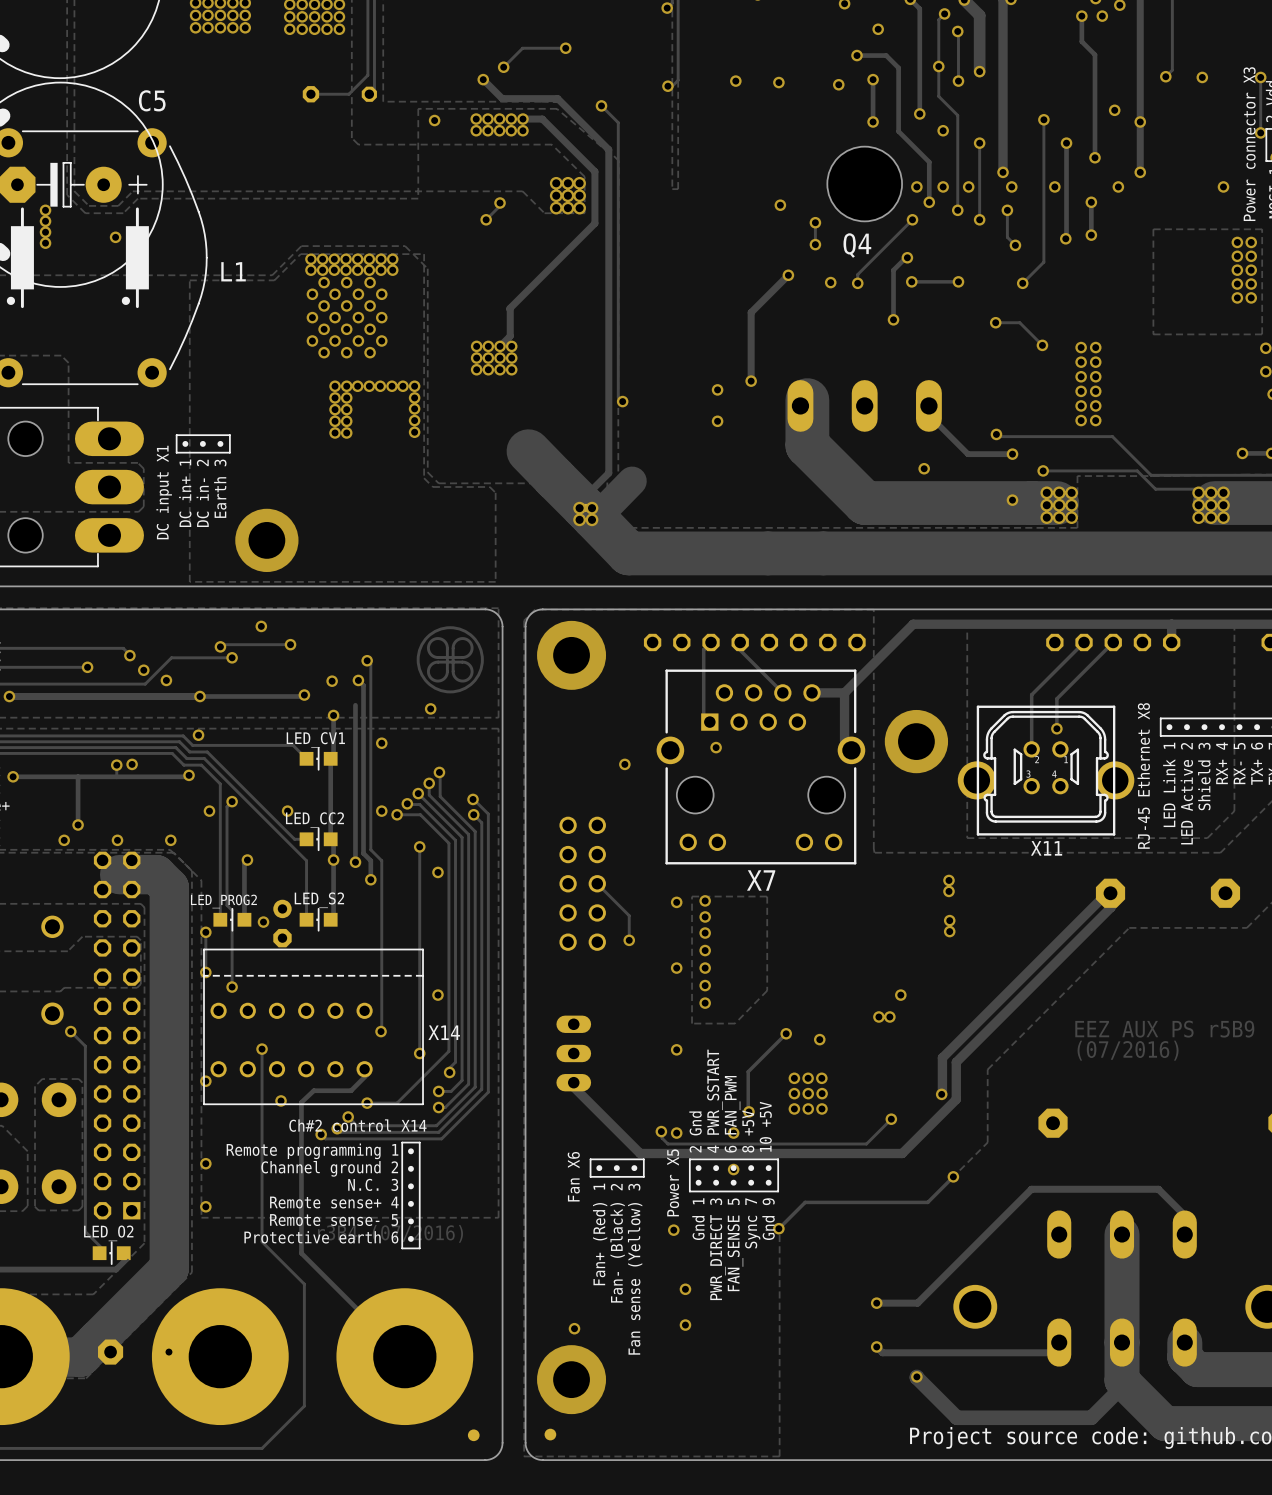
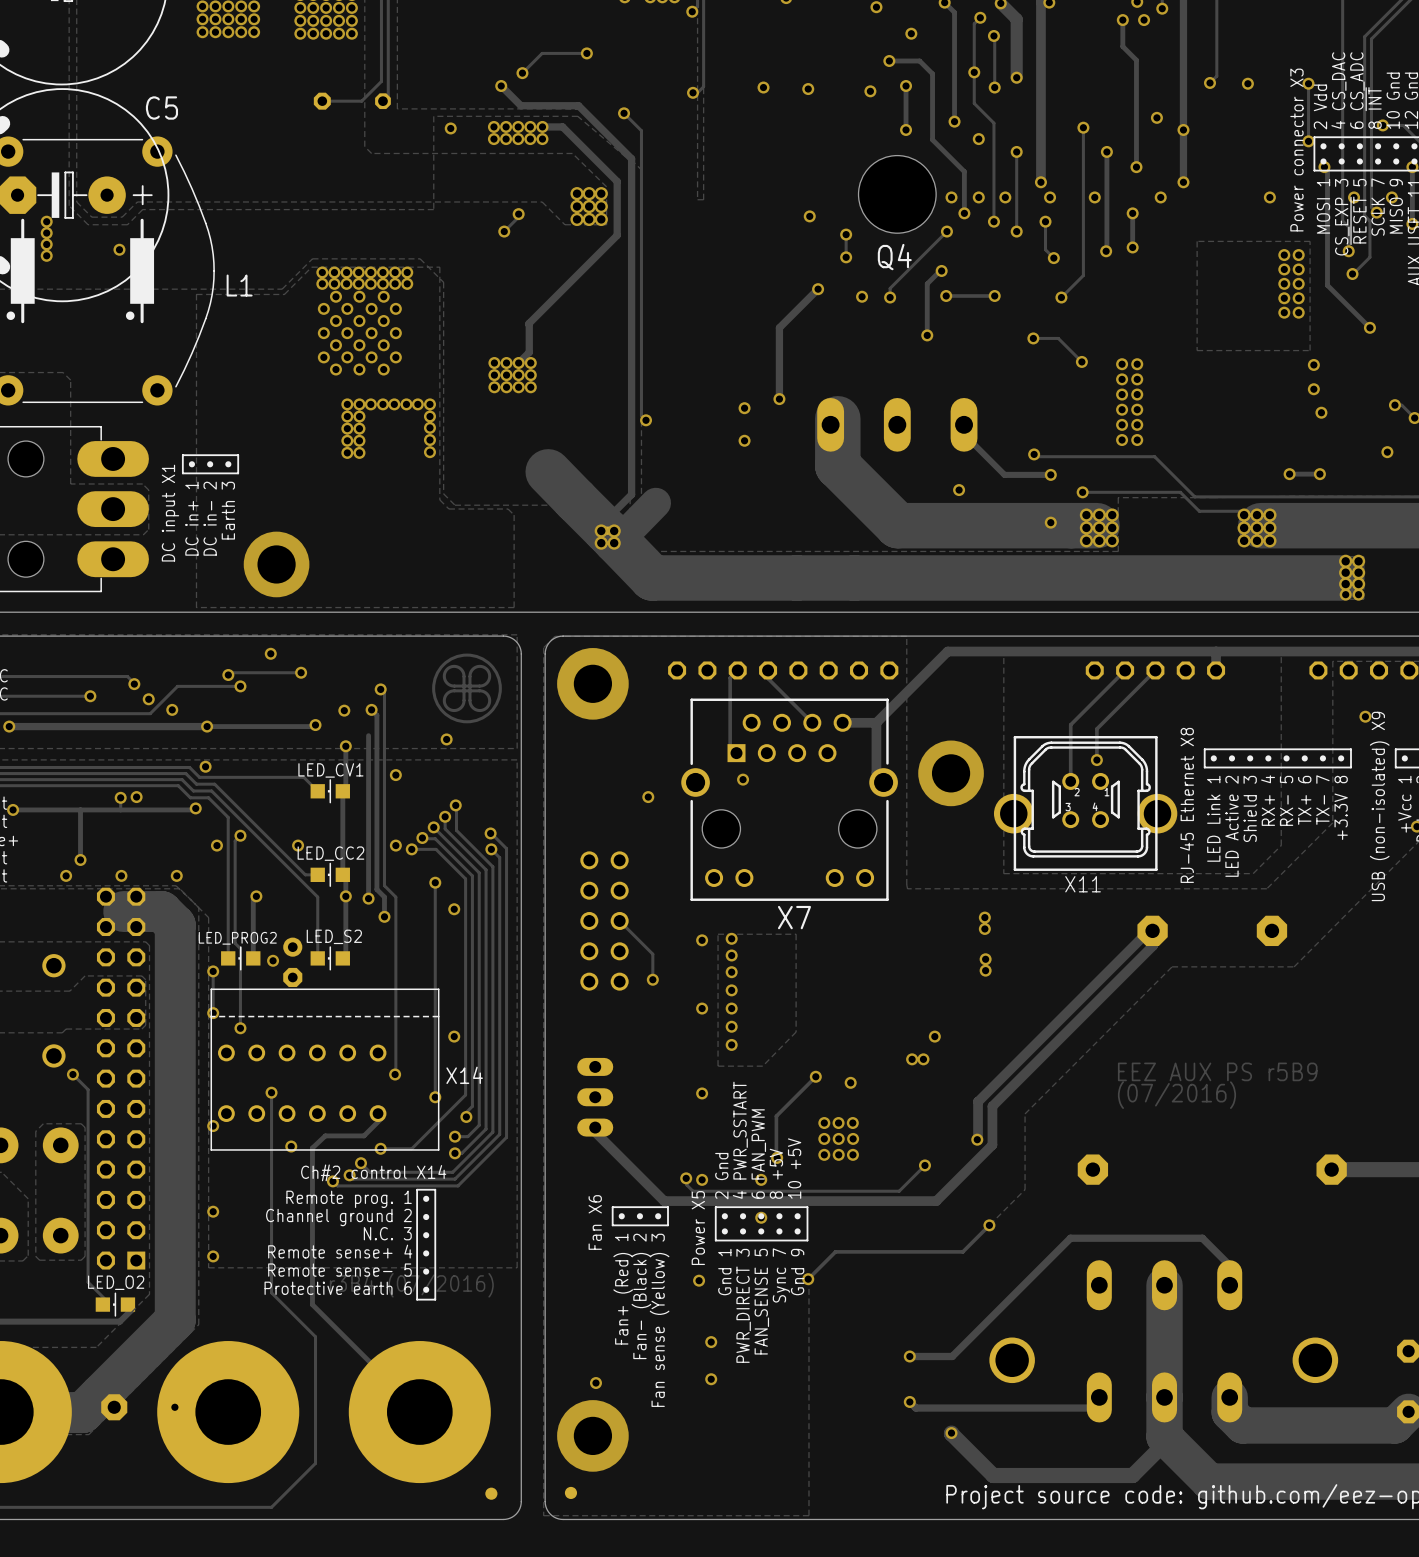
text: Remote programming 1 (312, 1151) -> Remote prog. 1 (349, 1199)

